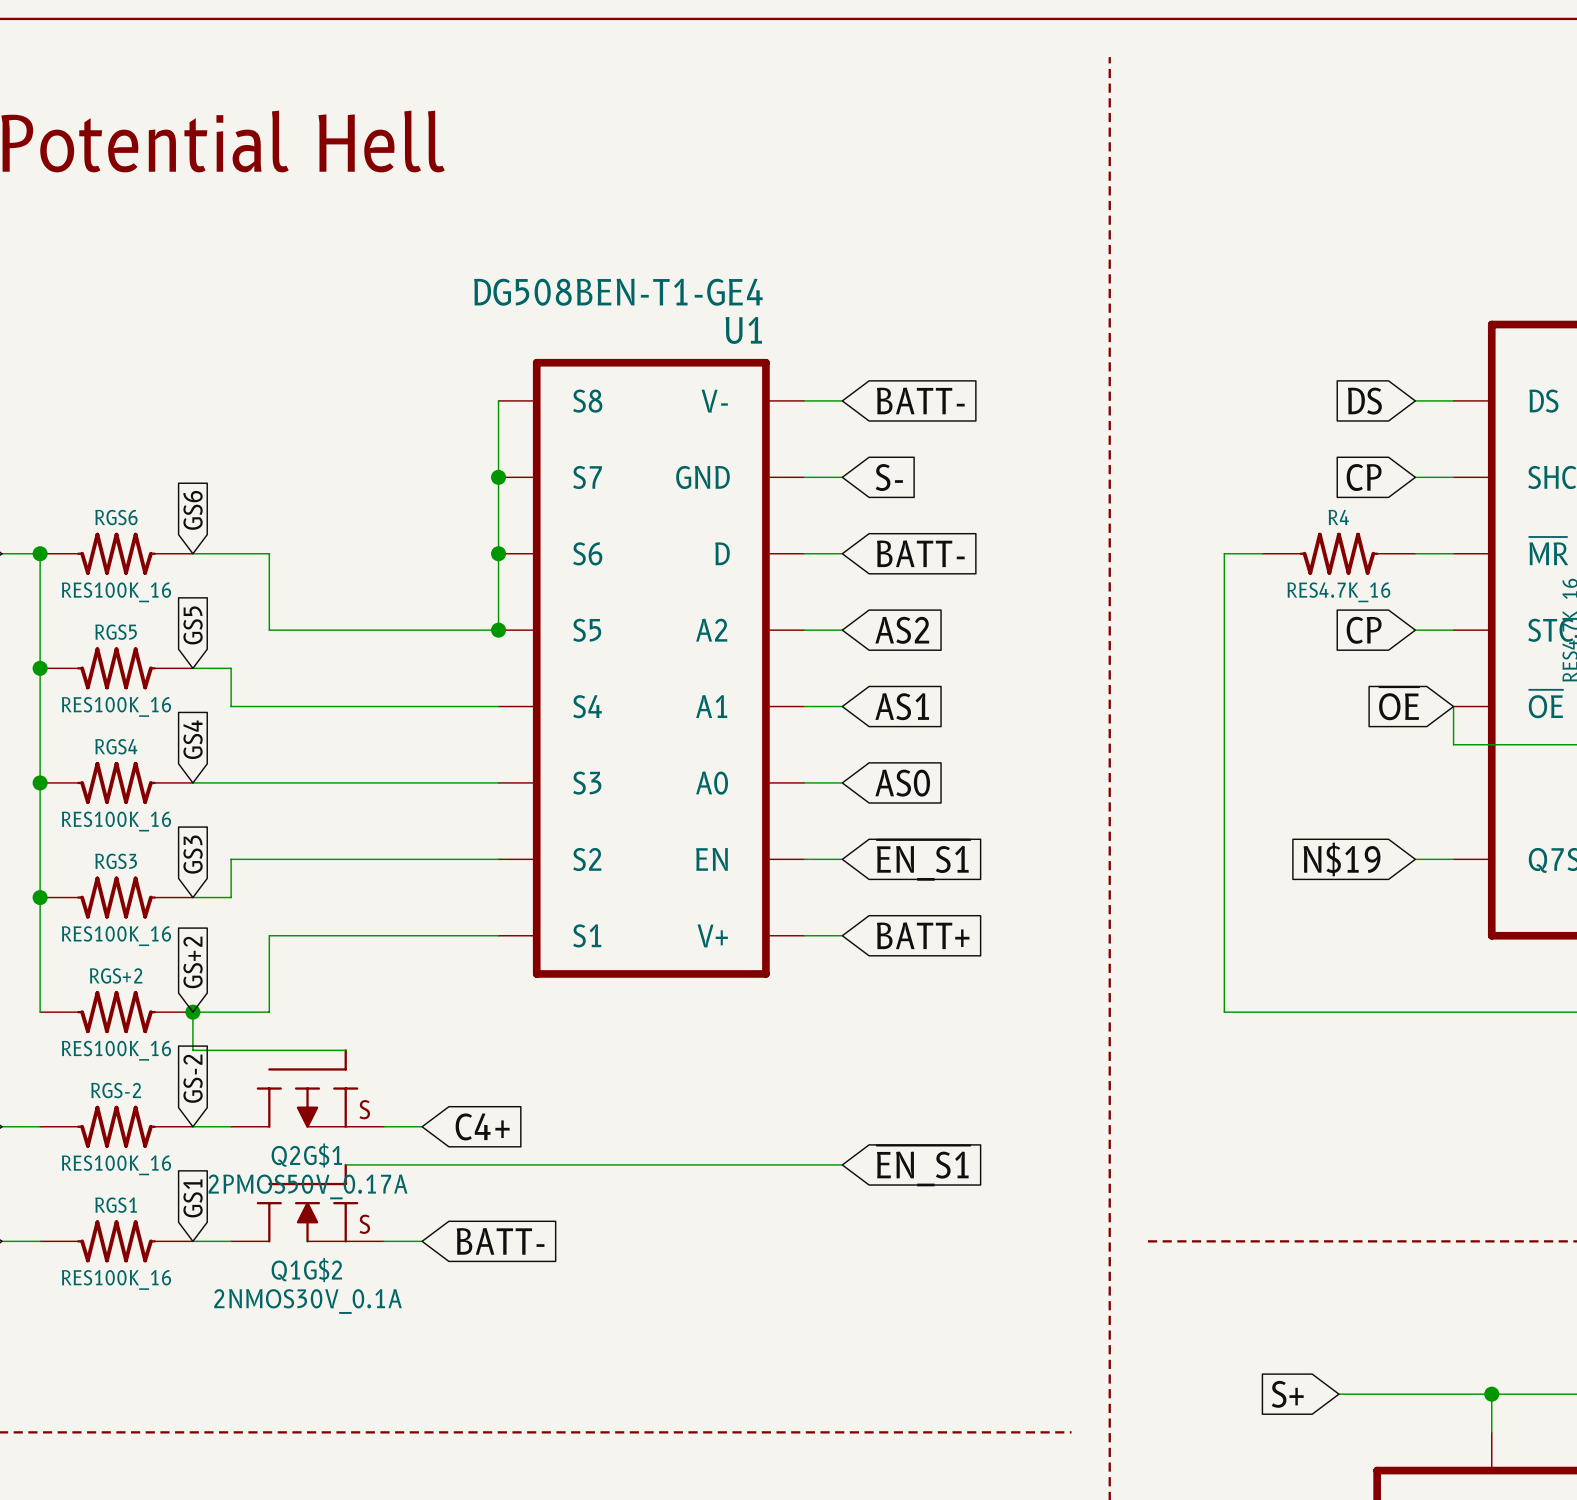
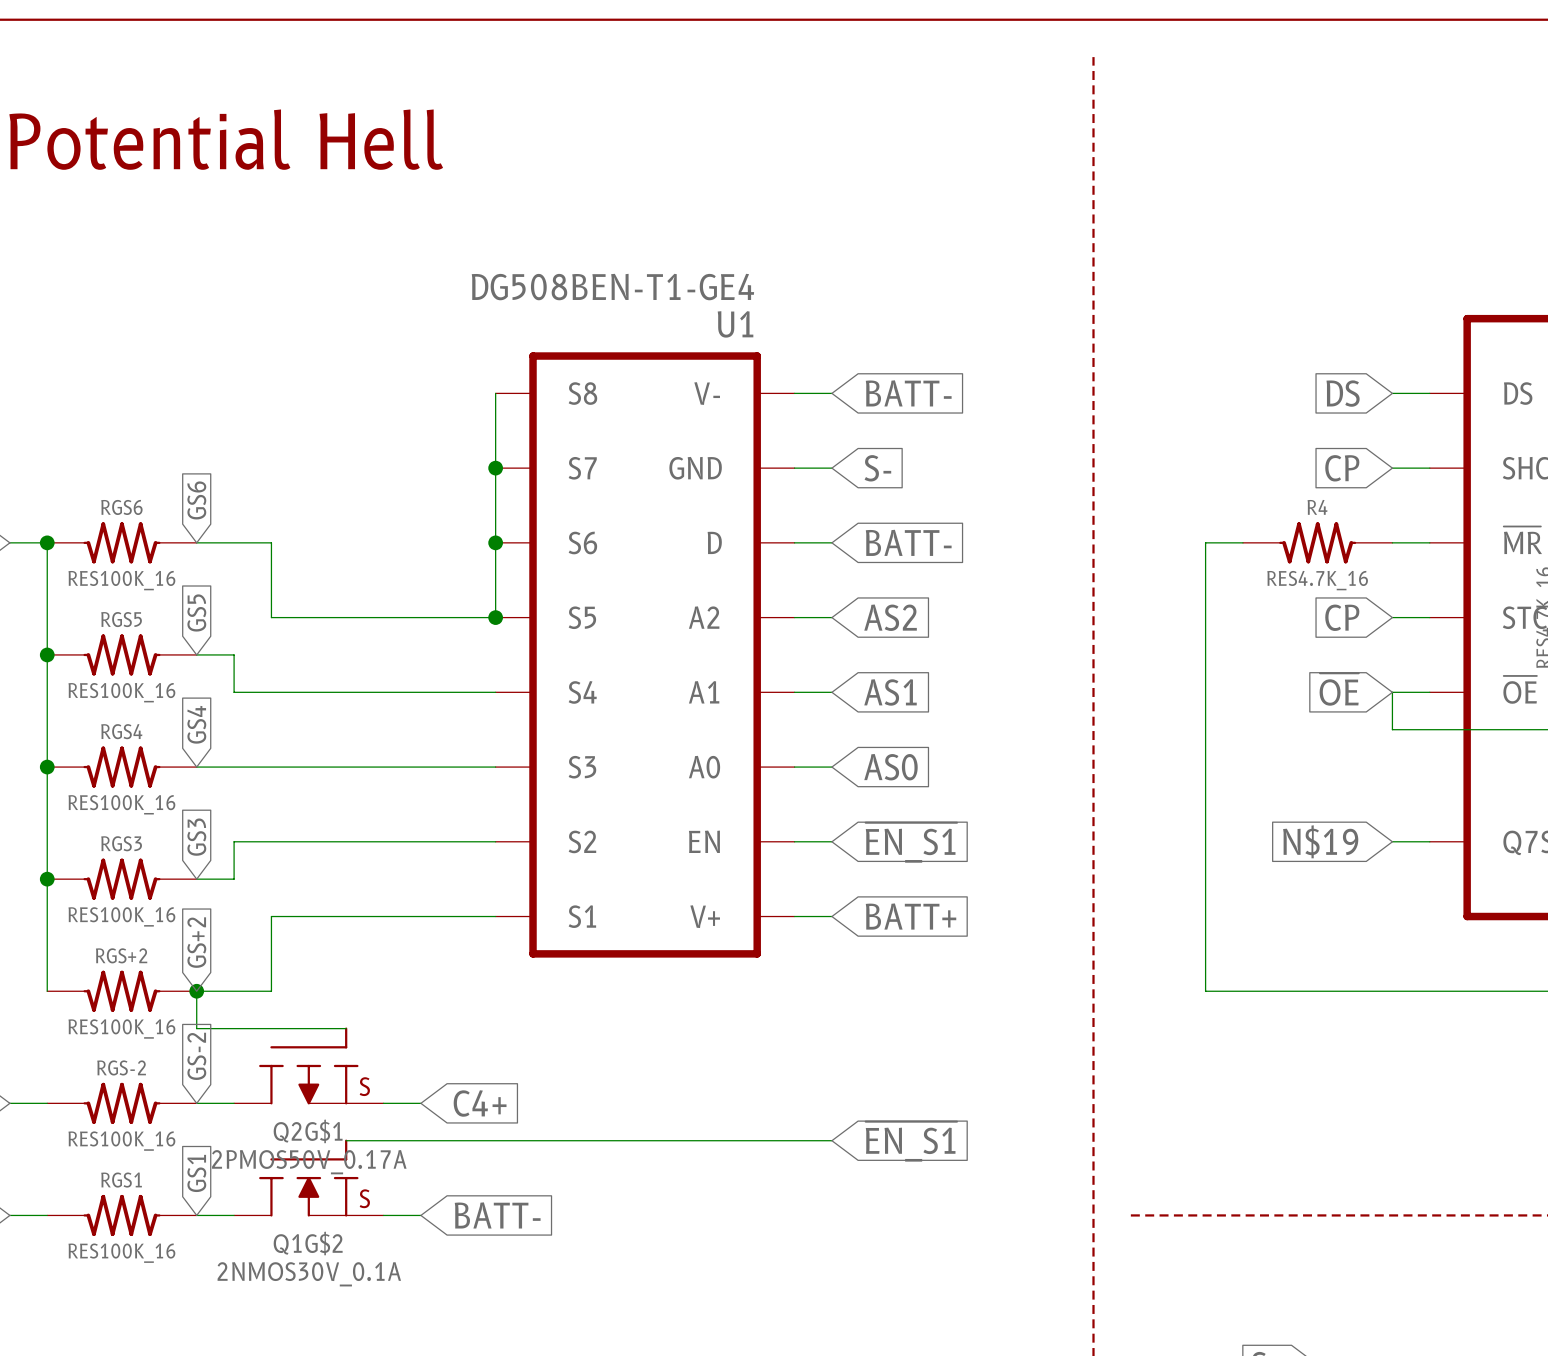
global label position: ~{OE} (1399, 703) -> ~{OE} (1339, 689)
wire: (1453, 706) (1453, 744) -> (1429, 692) (1392, 692) (1392, 729) (1429, 729)

